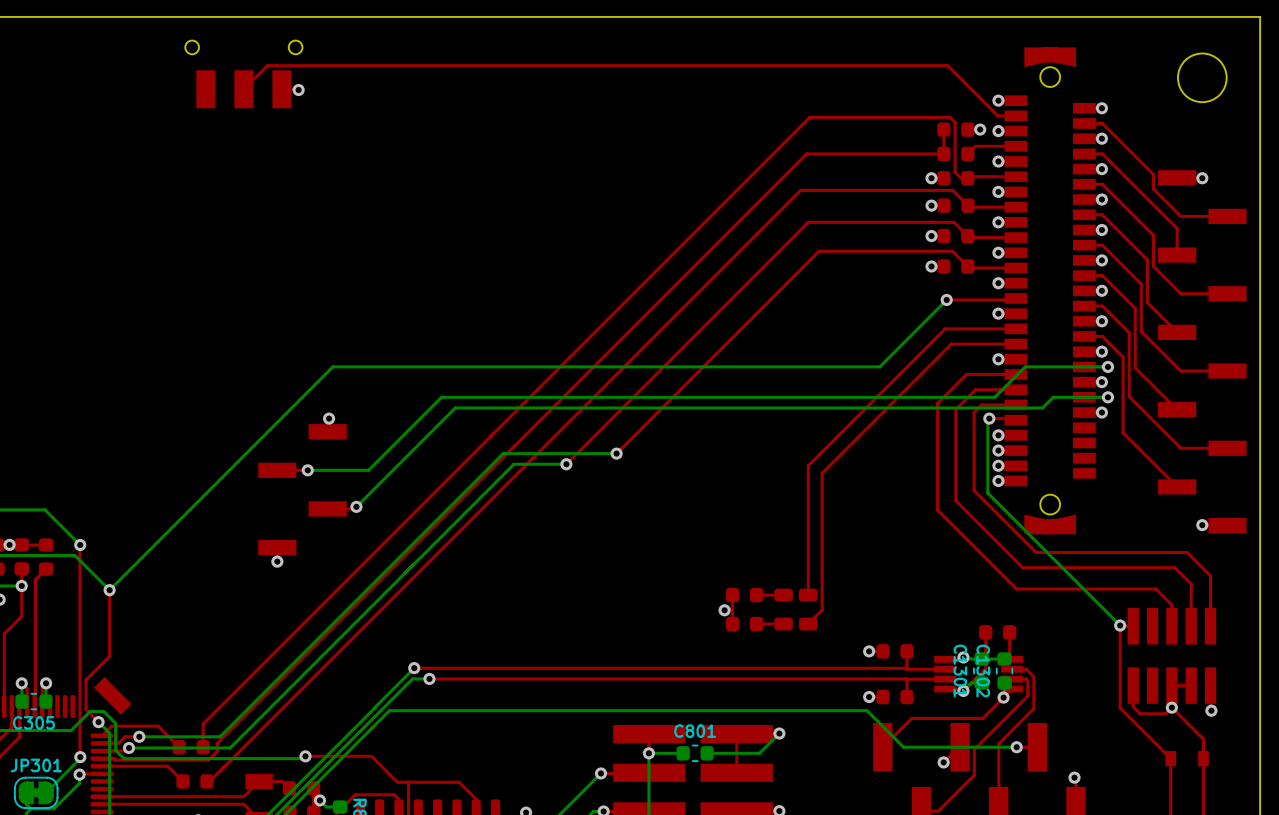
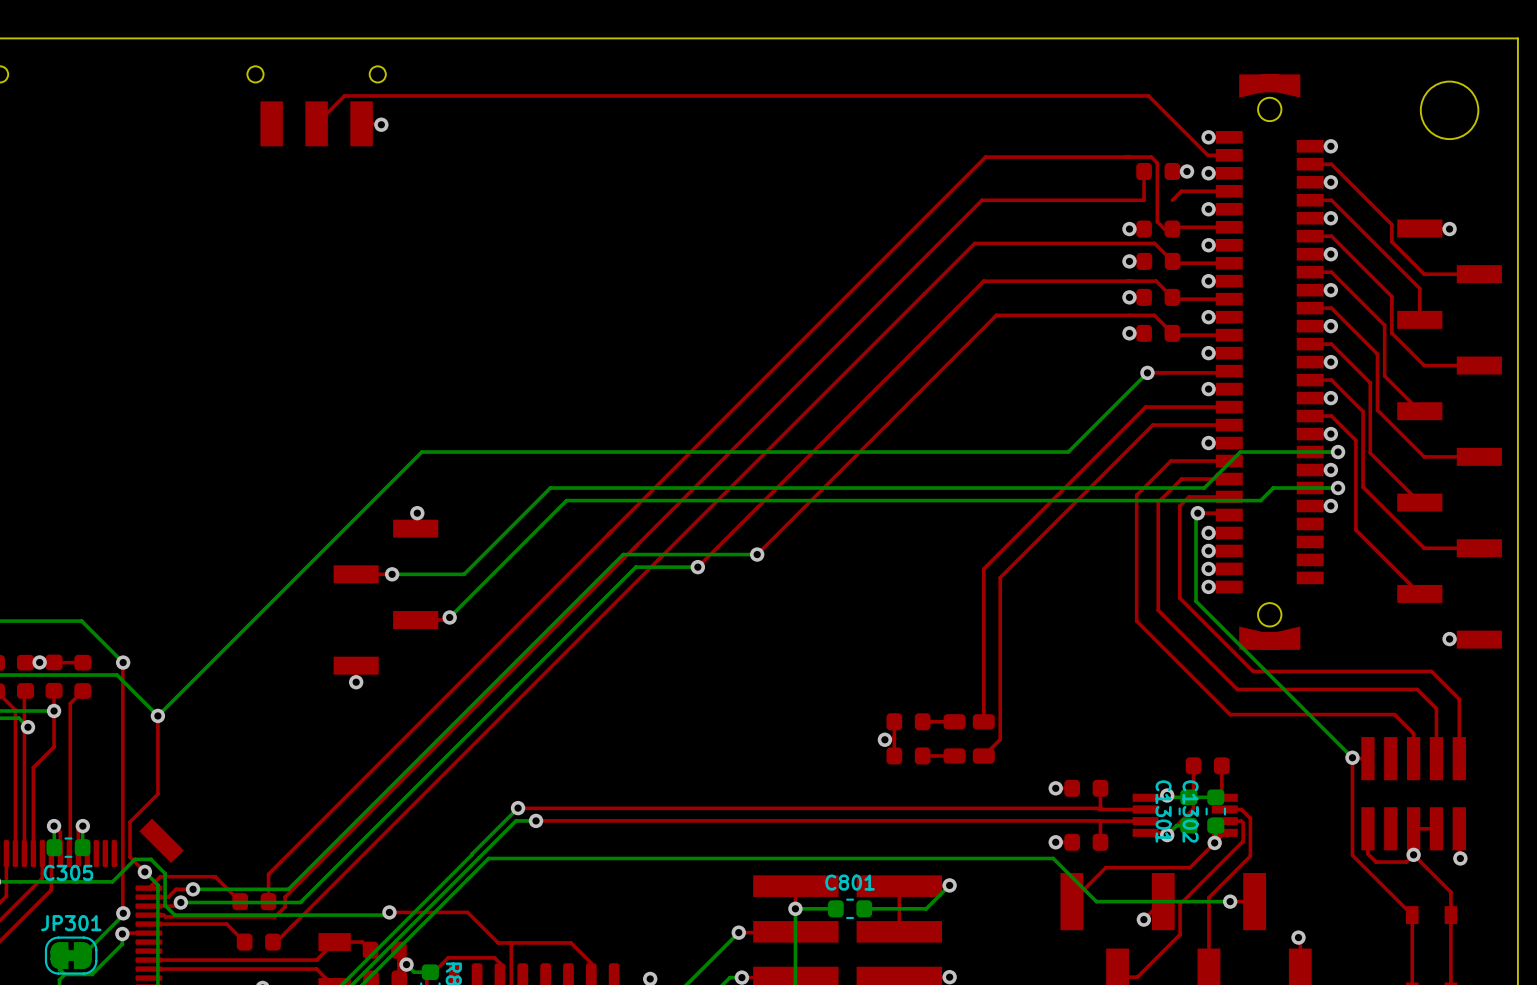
part: (955, 153) -> none

